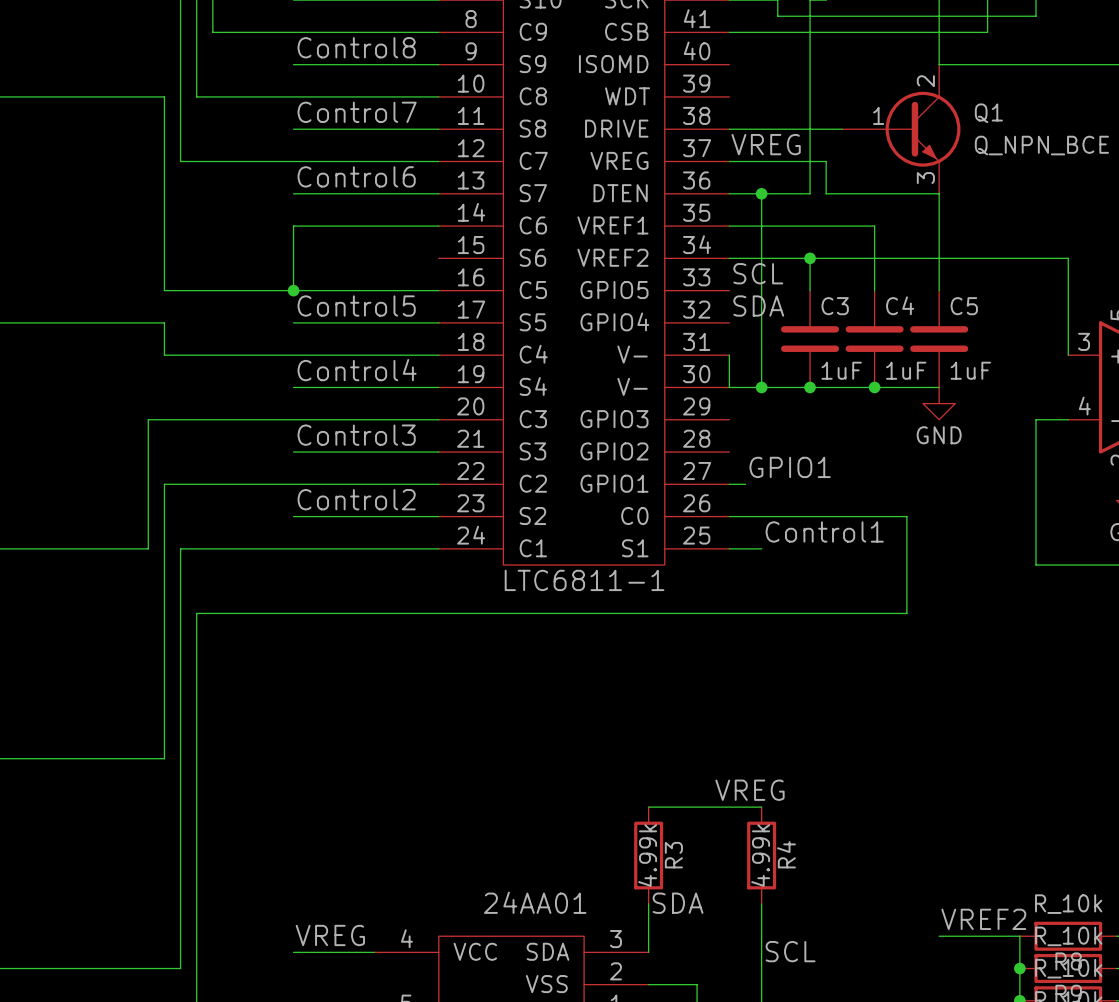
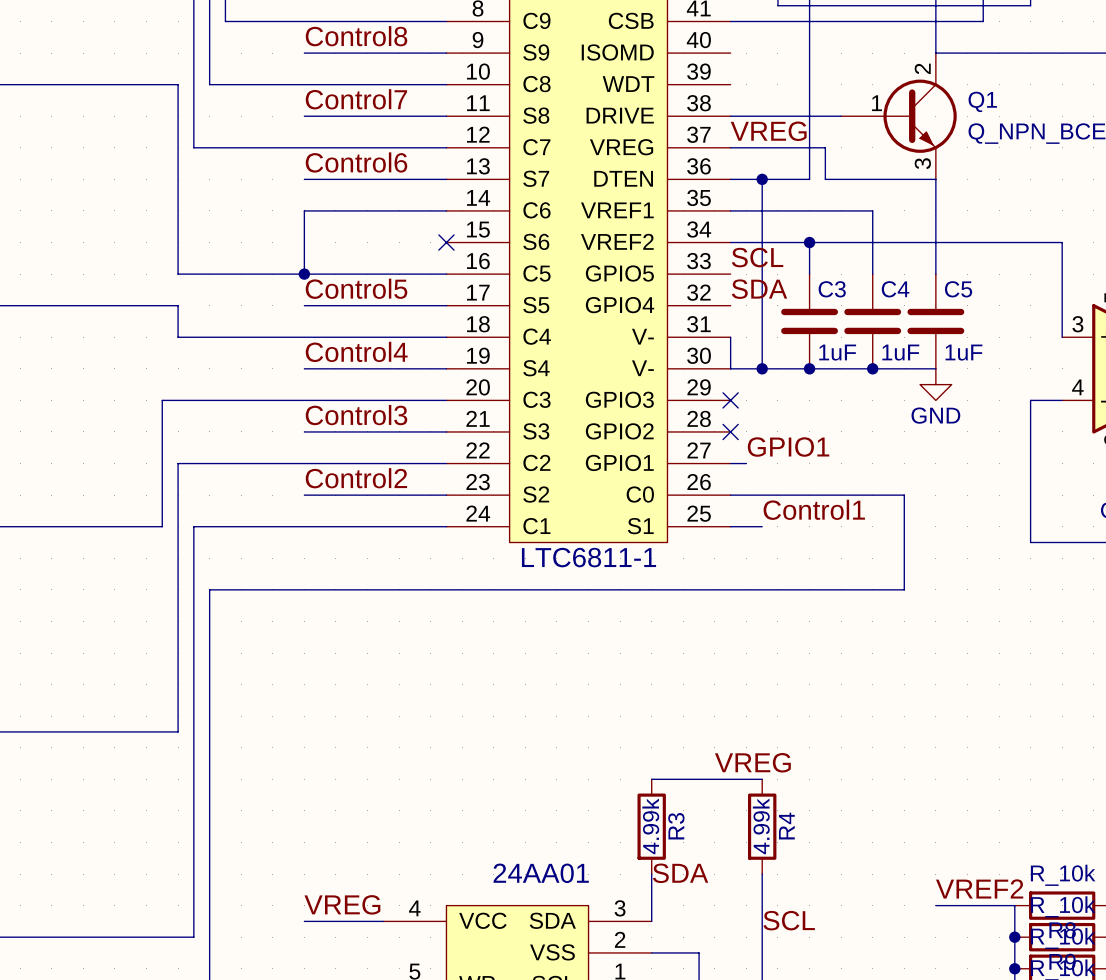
no-connect mark: none -> (446, 242)
no-connect mark: none -> (730, 400)
no-connect mark: none -> (730, 431)

